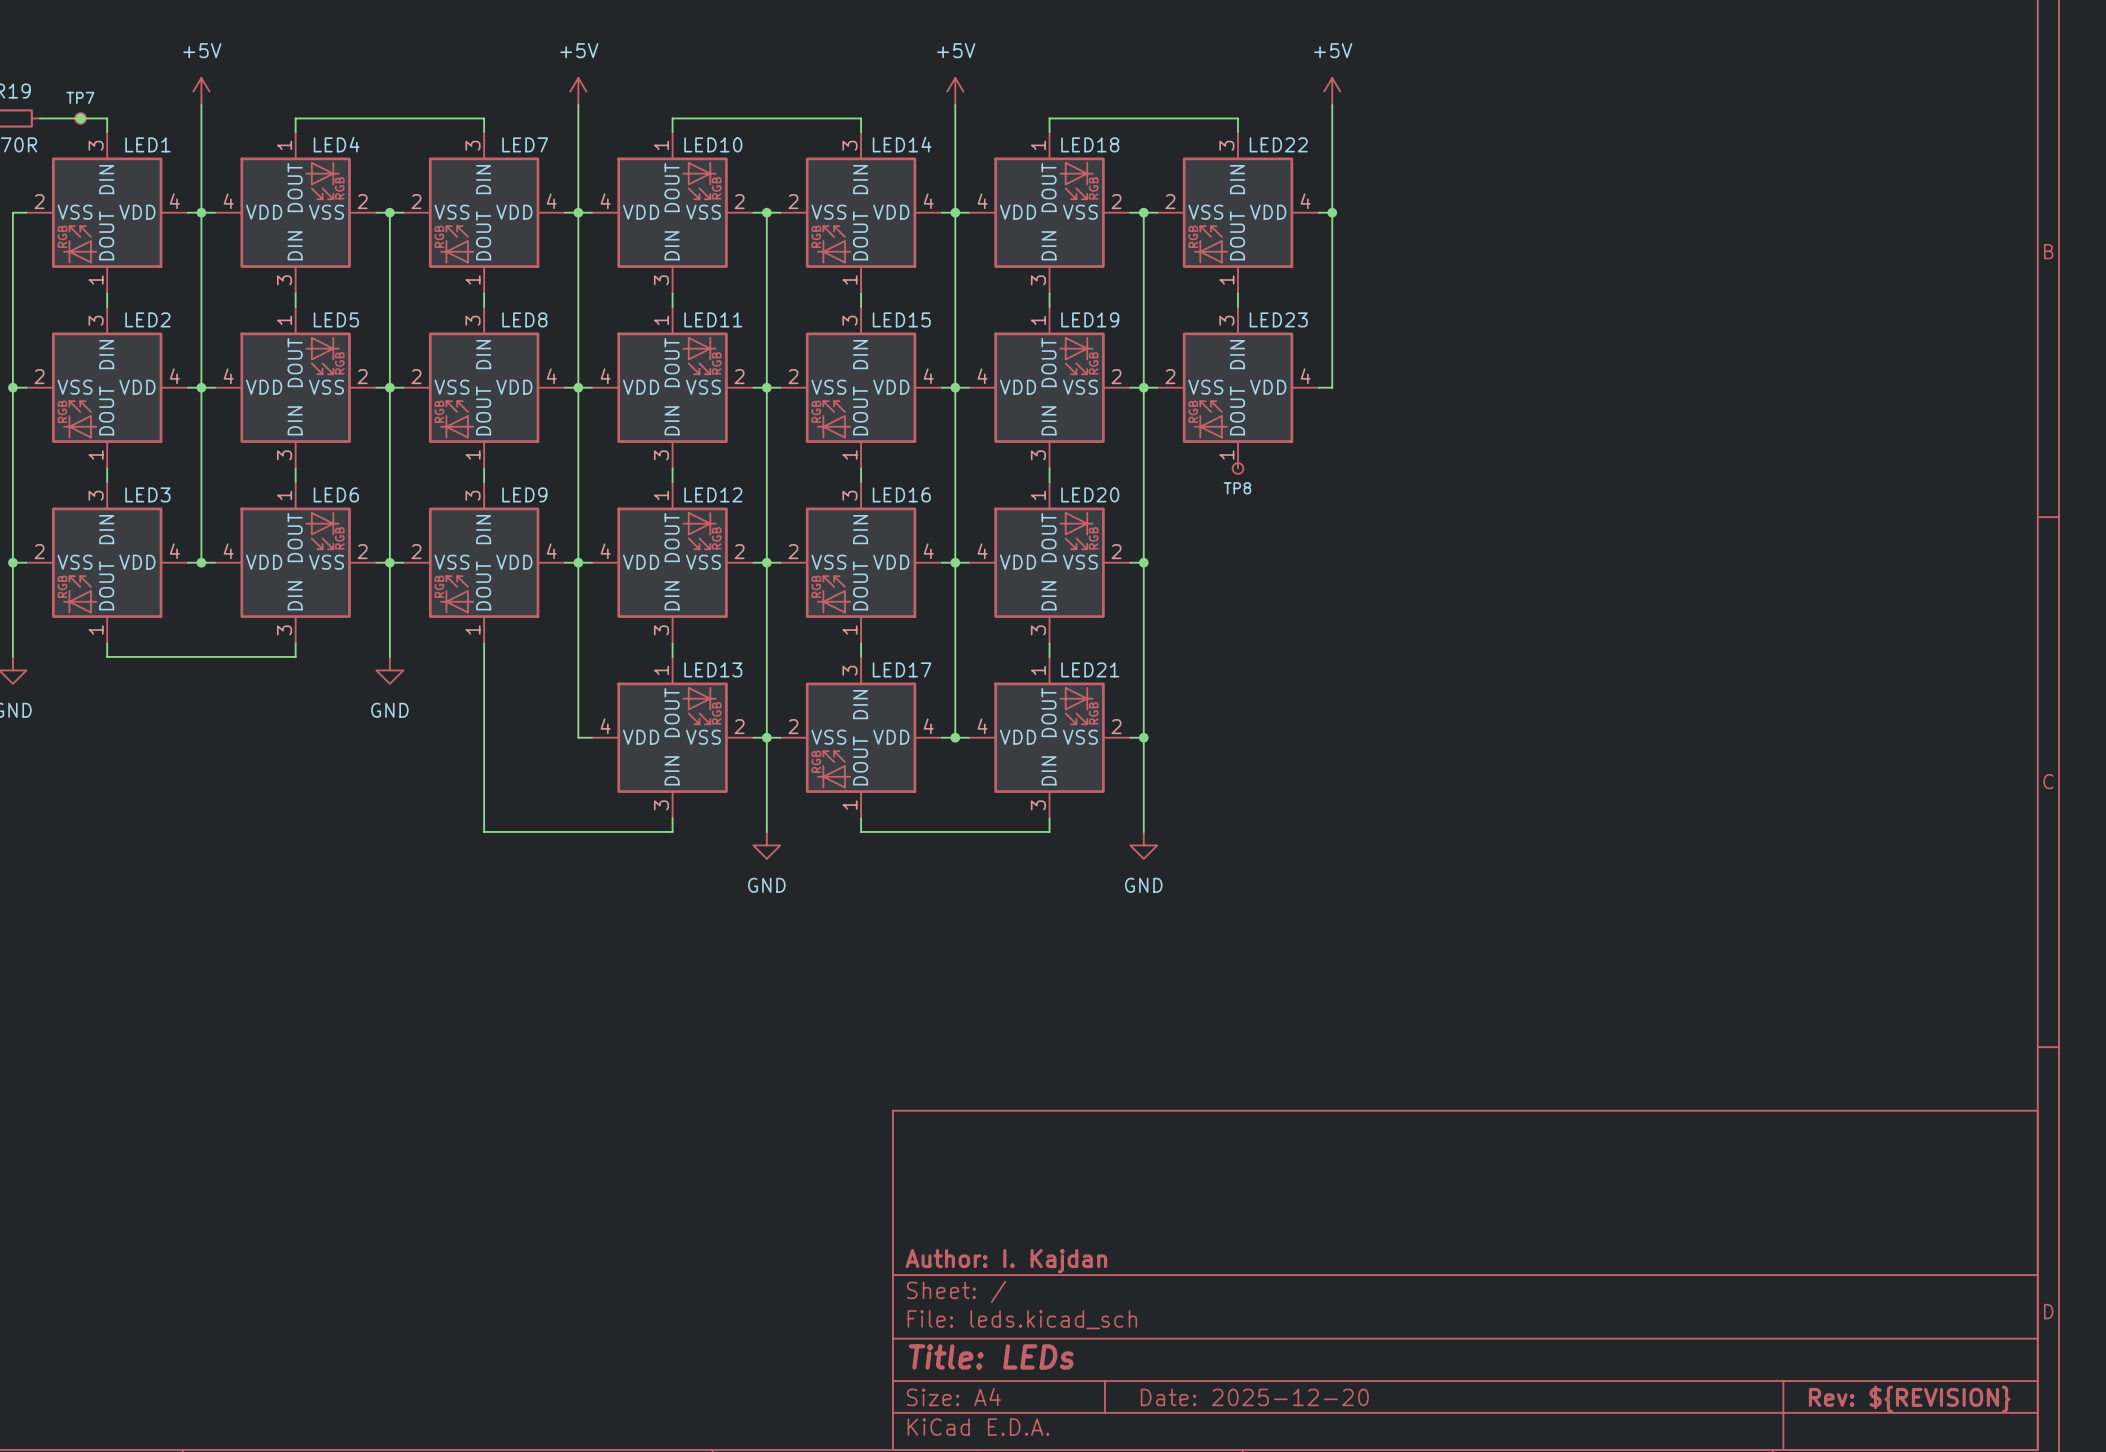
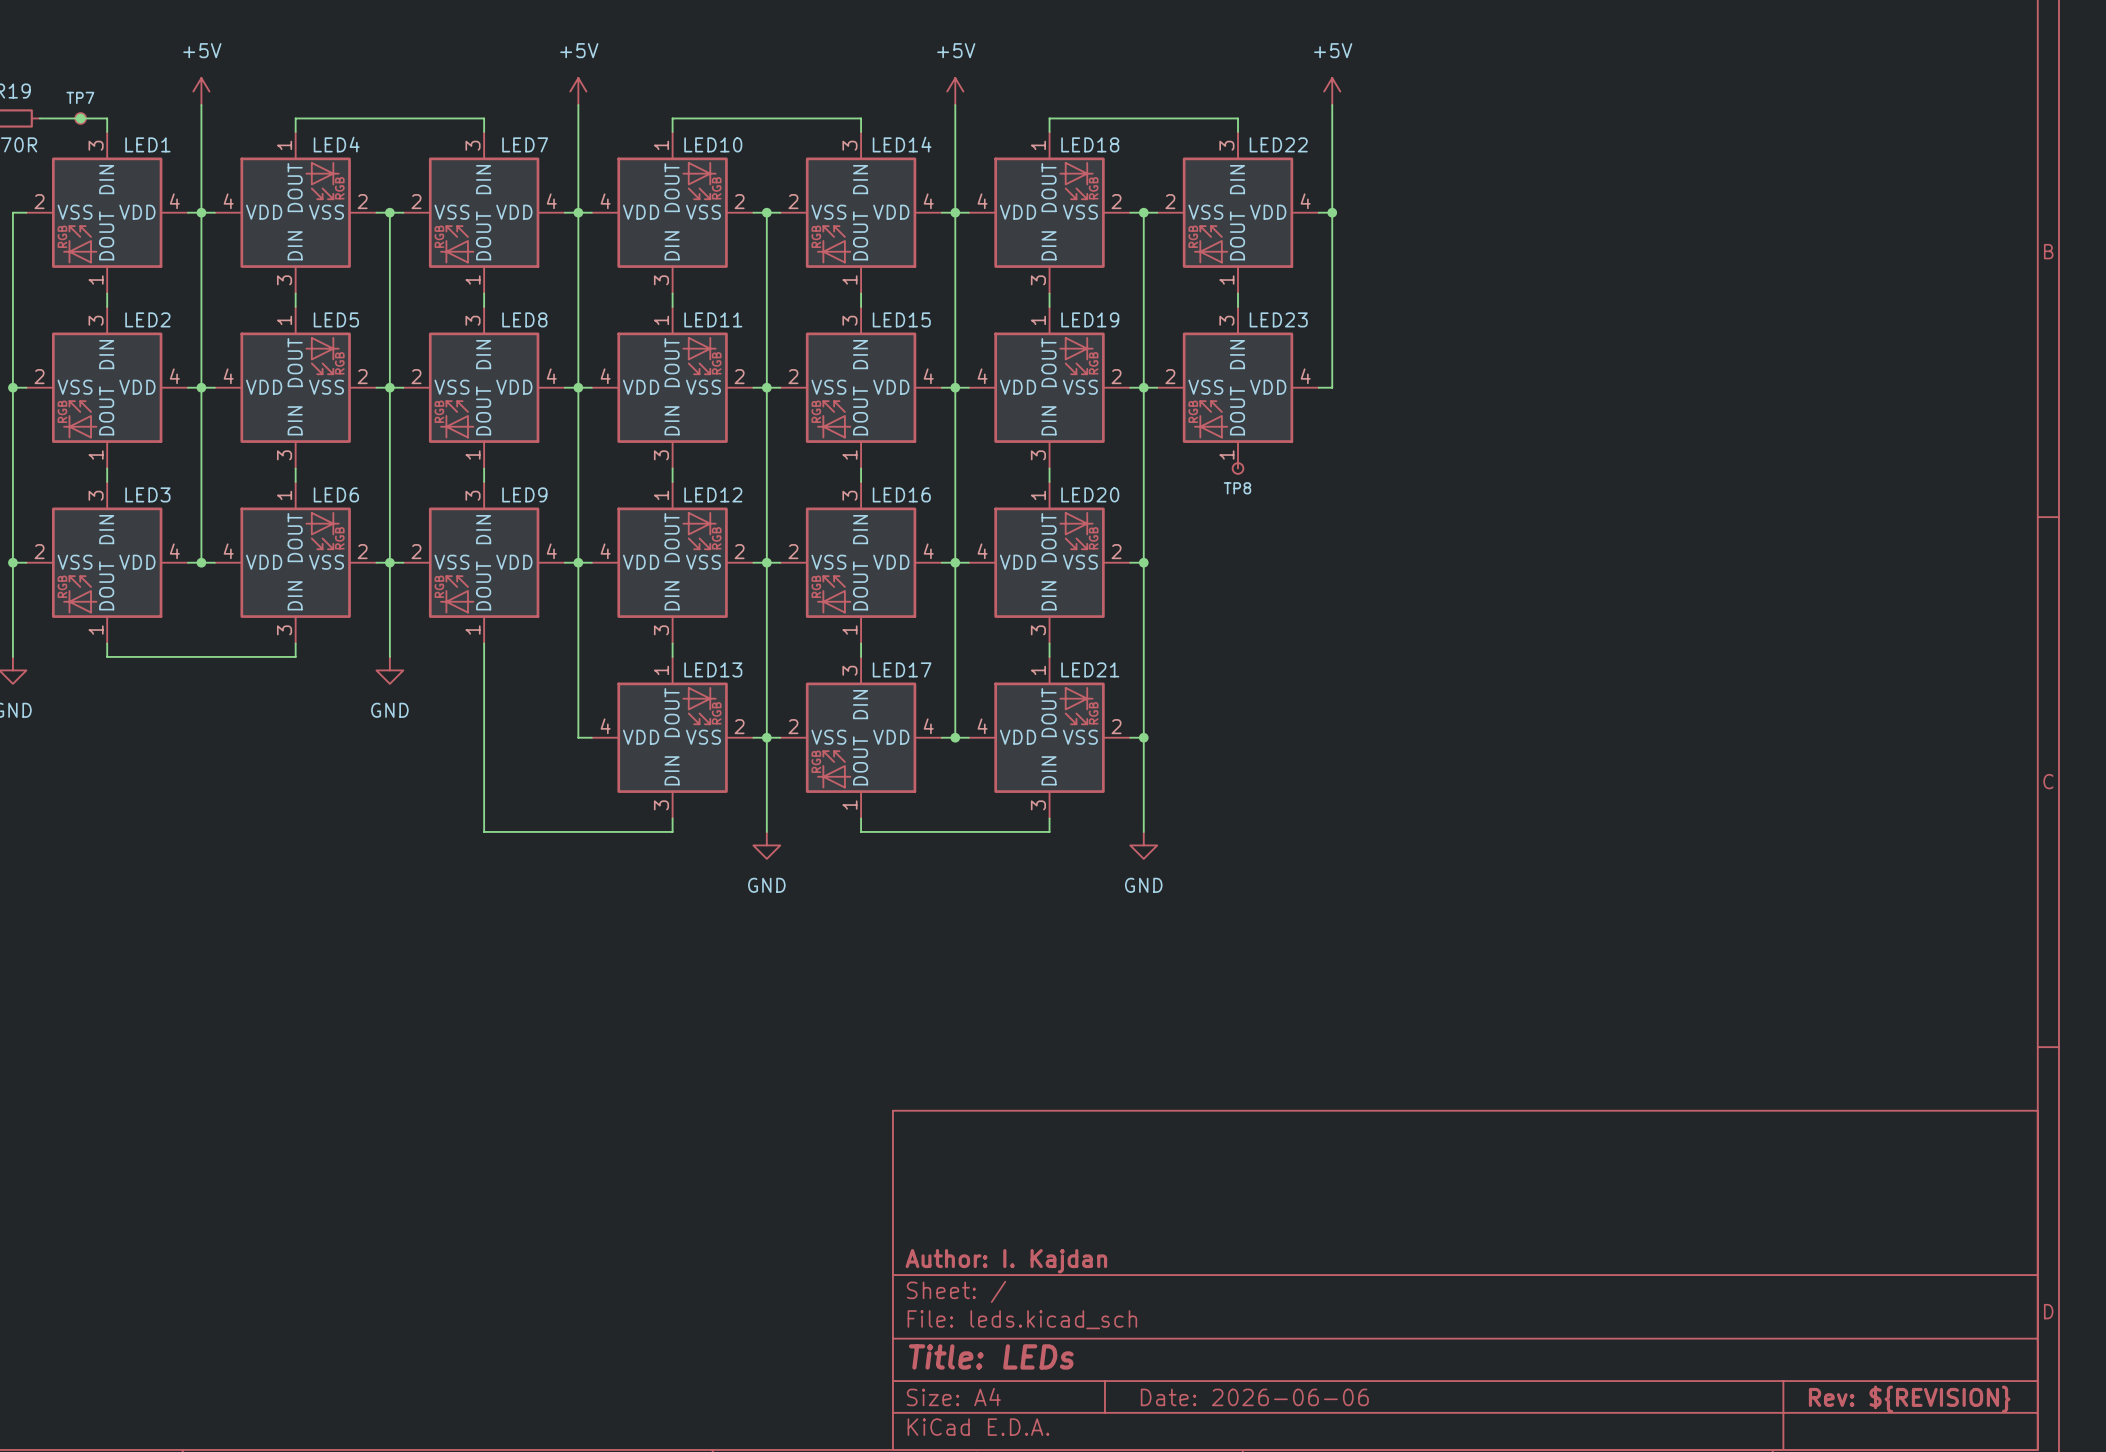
title block: Date: 2025-12-20 (1254, 1397) -> Date: 2026-06-06 (1254, 1397)

